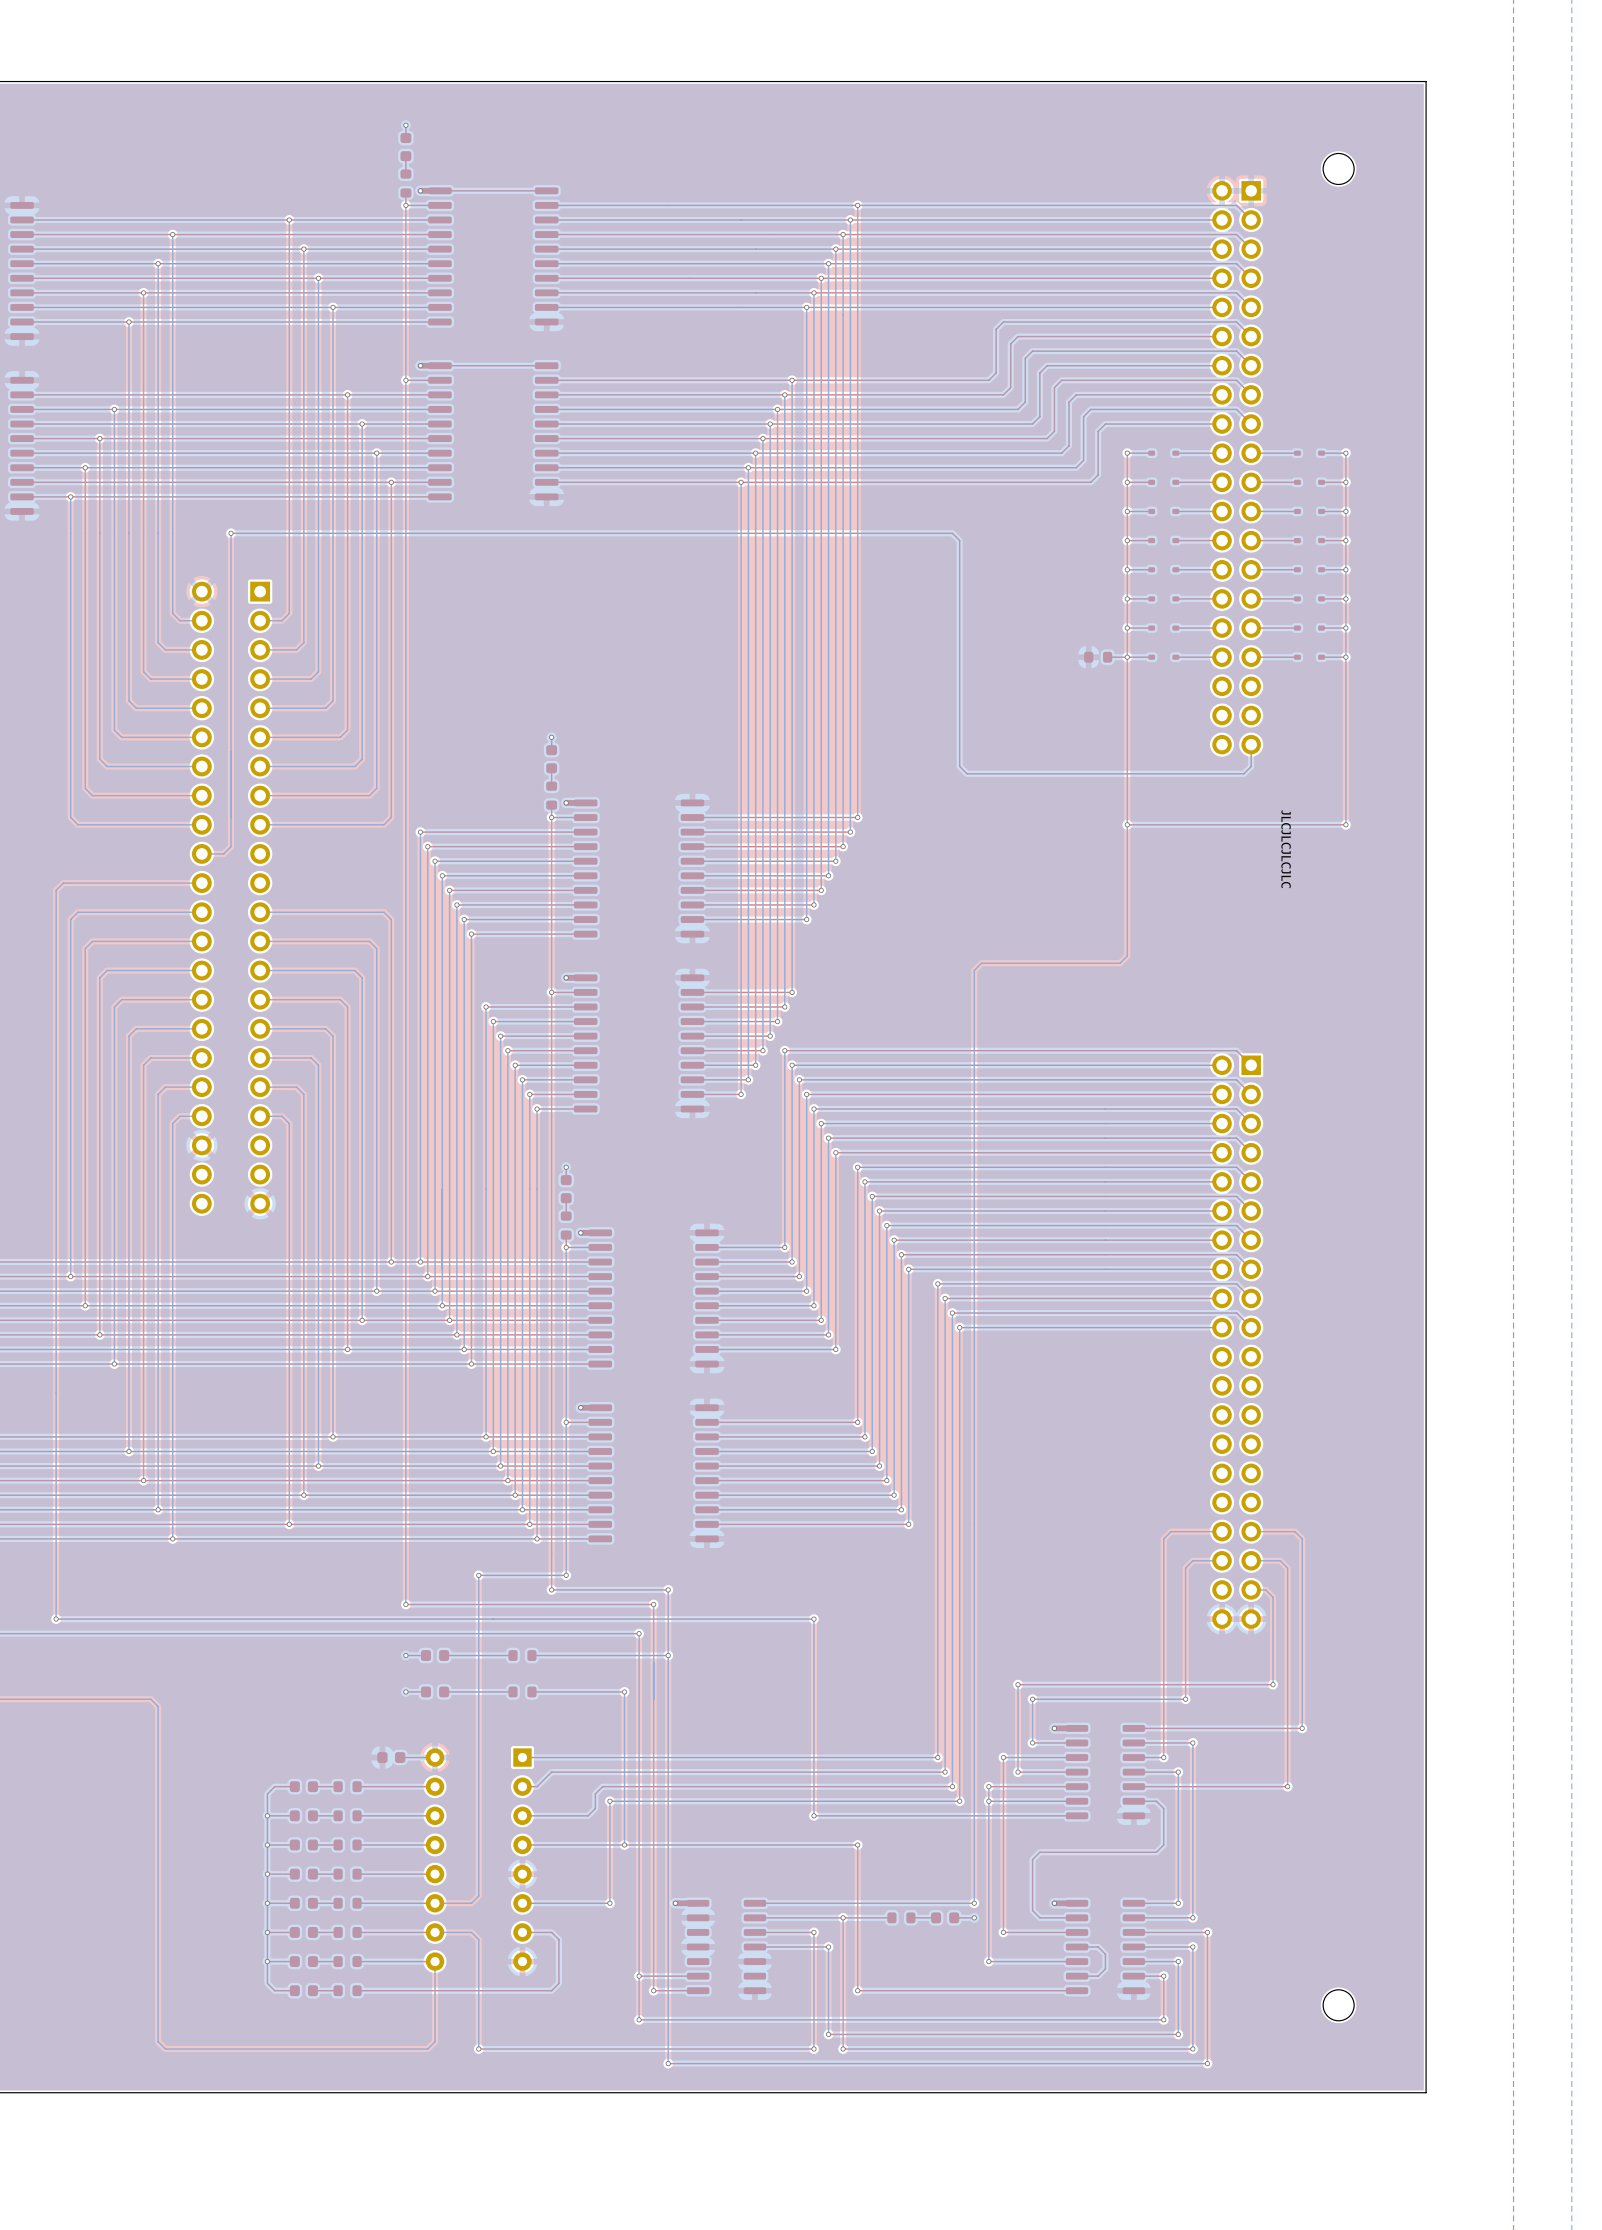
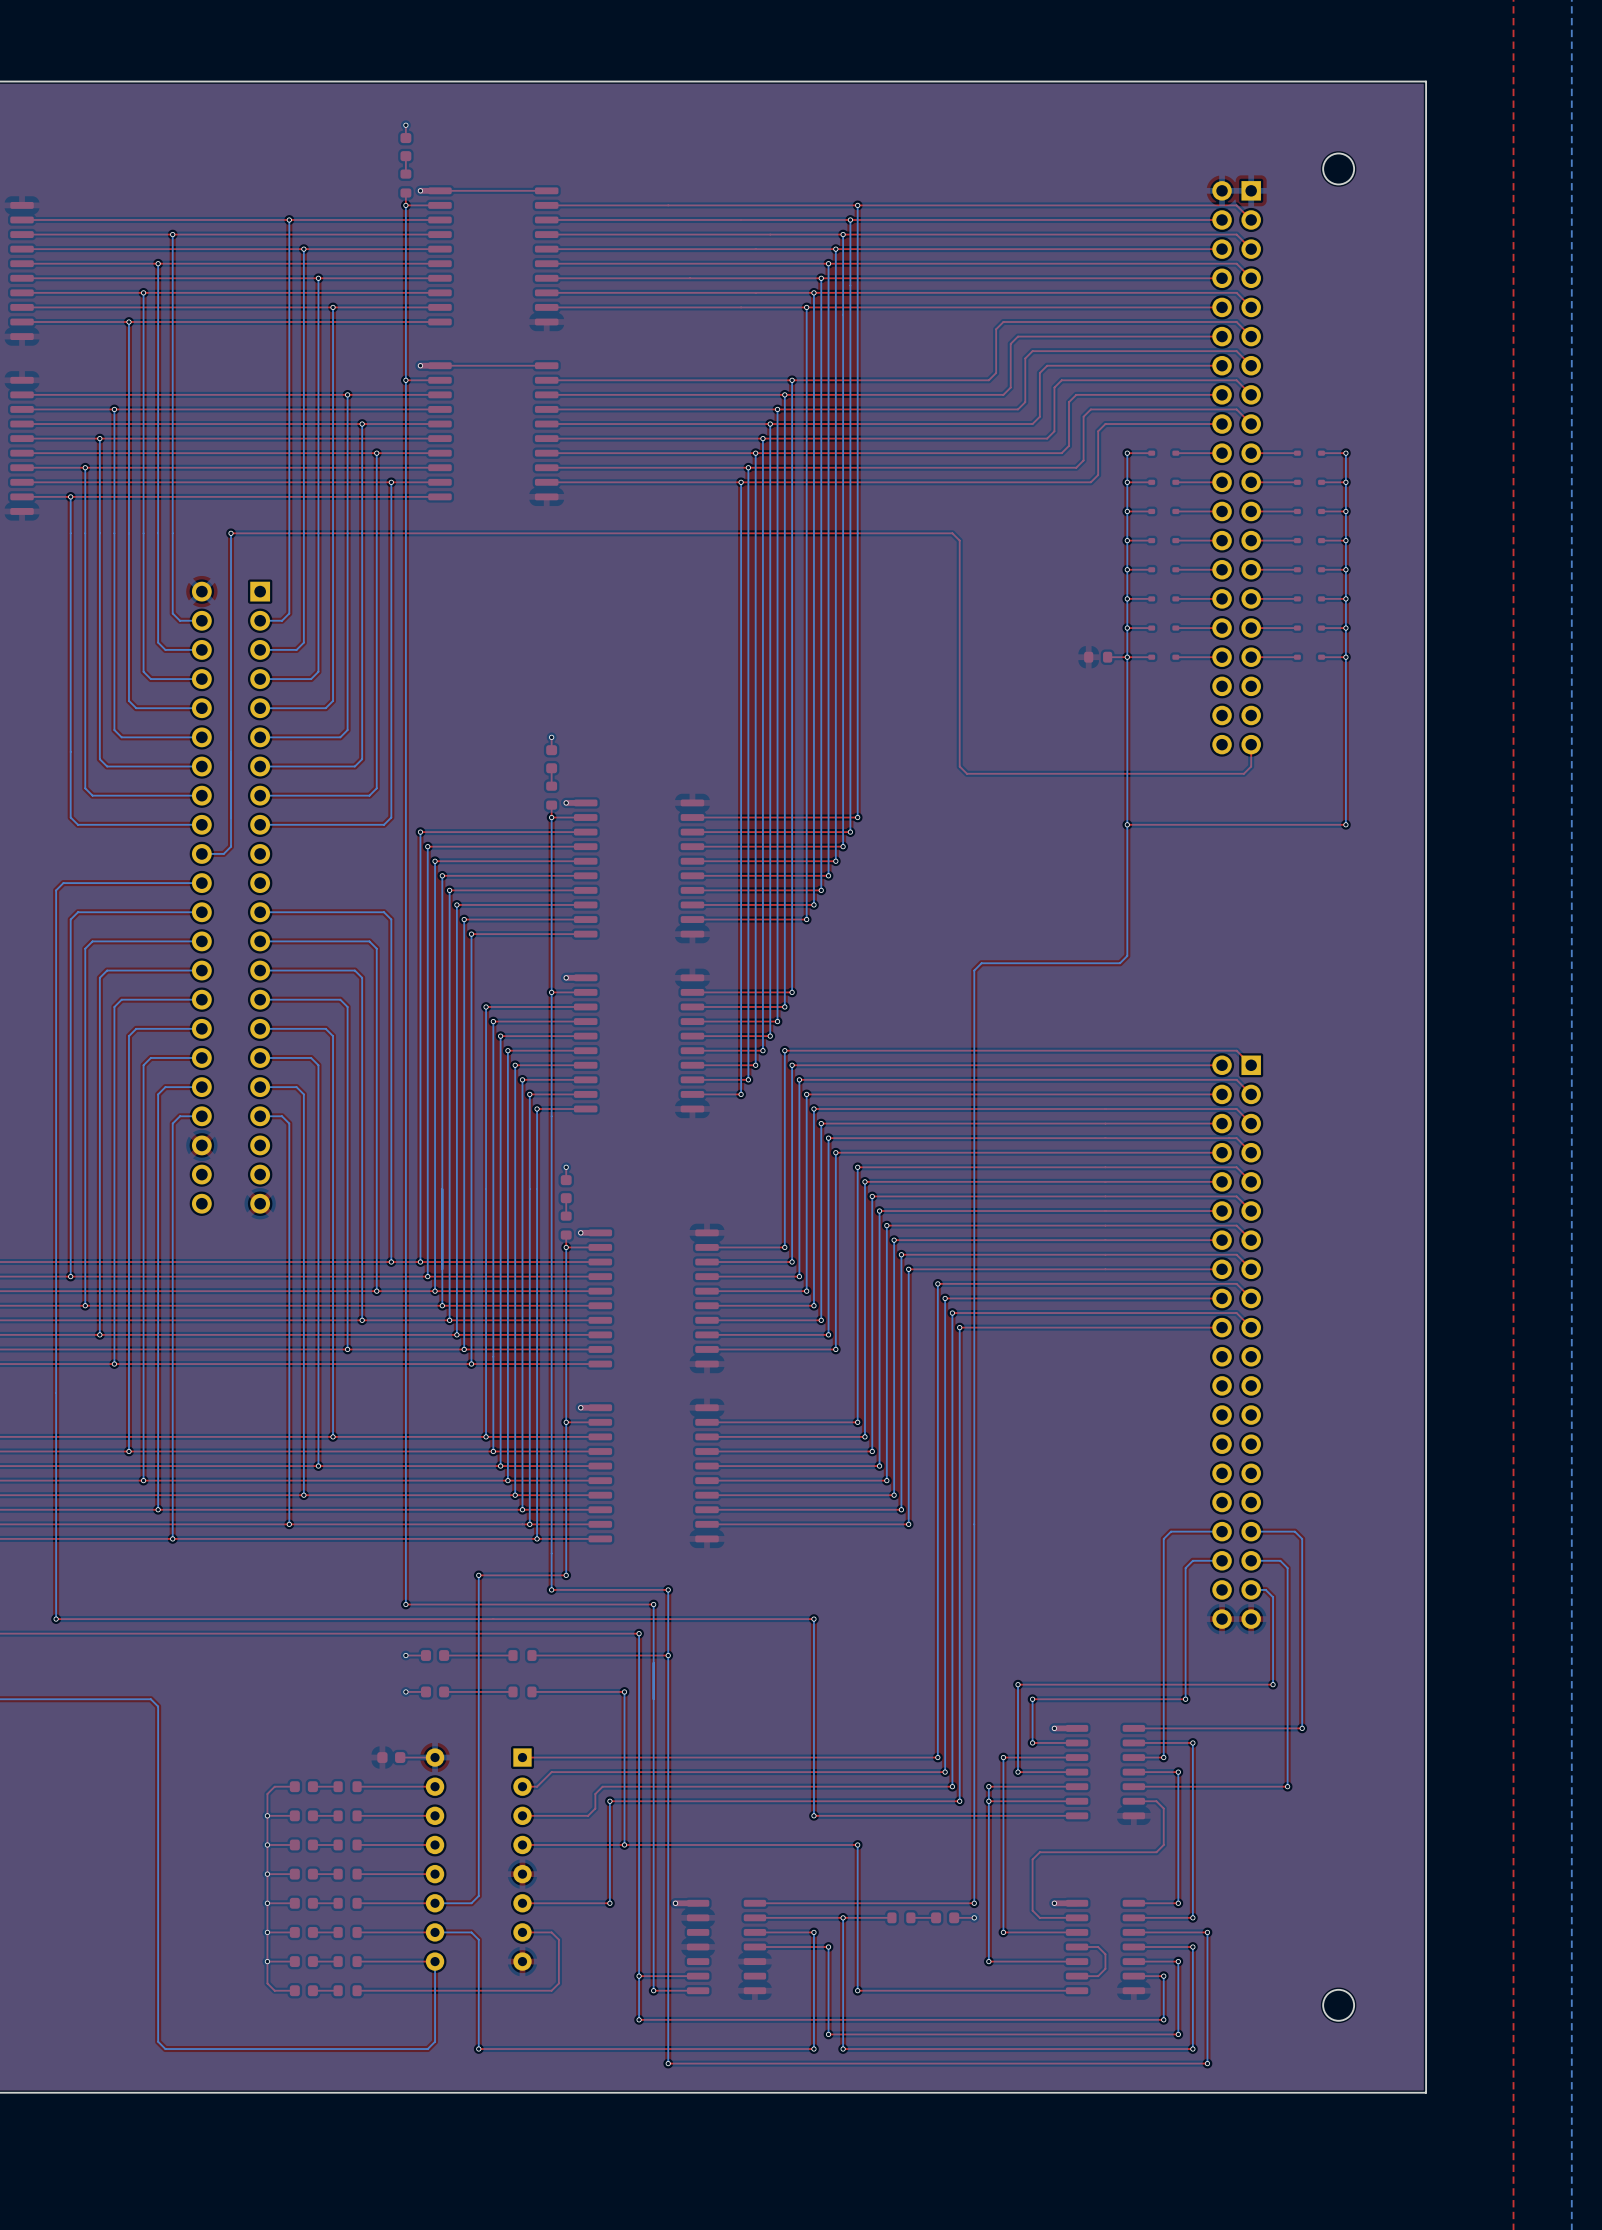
text: JLCJLCJLCJLC (1286, 849) -> none

